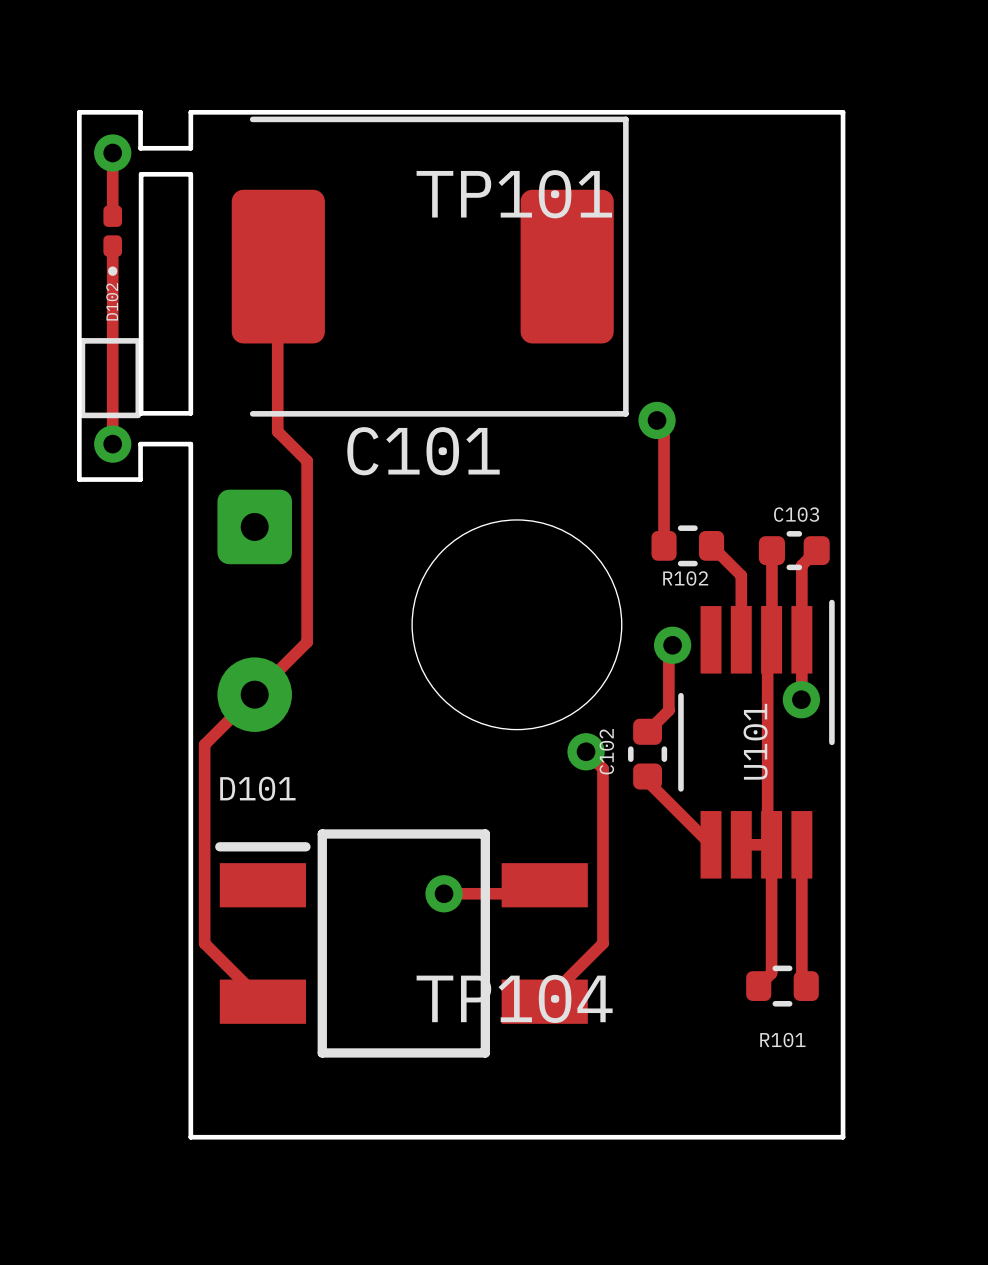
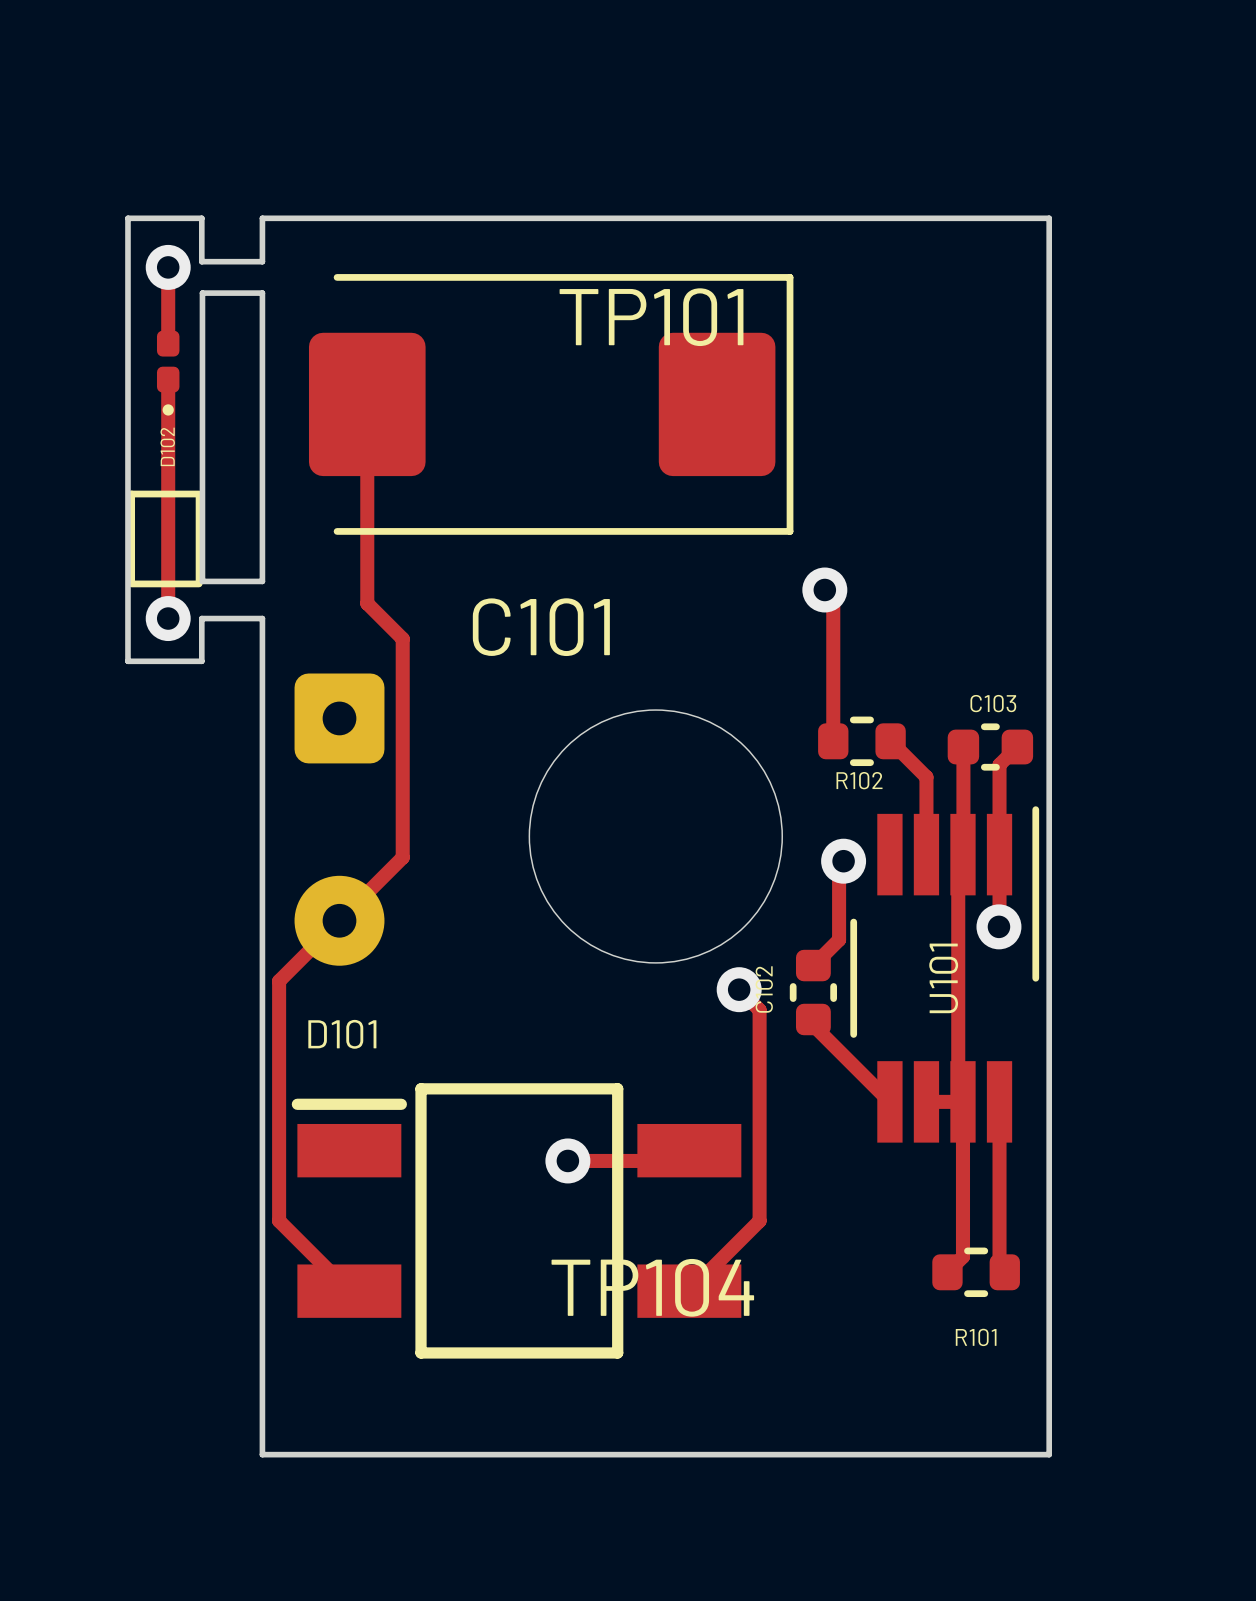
C101 footprint: [231, 116, 629, 417] -> [308, 274, 794, 535]

